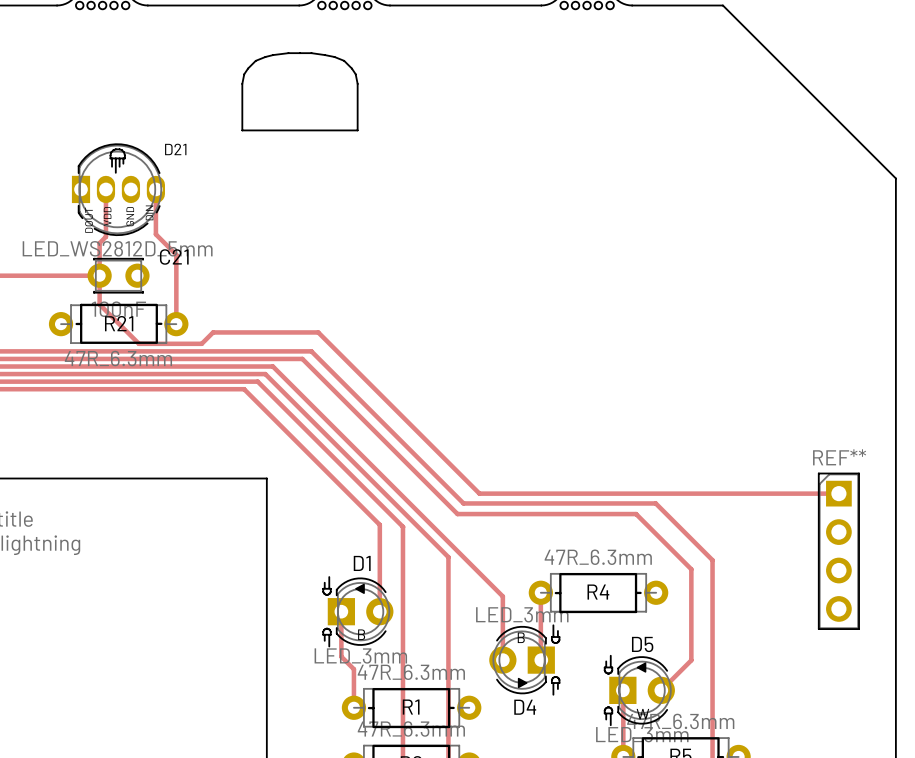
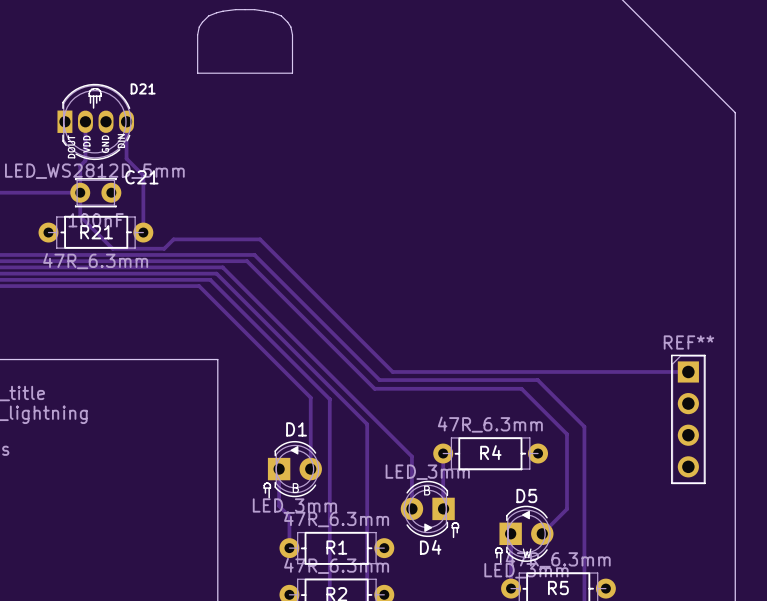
D1 footprint: [322, 576, 394, 648] -> [263, 440, 322, 499]
D4 footprint: [489, 624, 561, 696] -> [400, 480, 460, 539]
D5 footprint: [603, 654, 675, 727] -> [494, 505, 554, 564]

